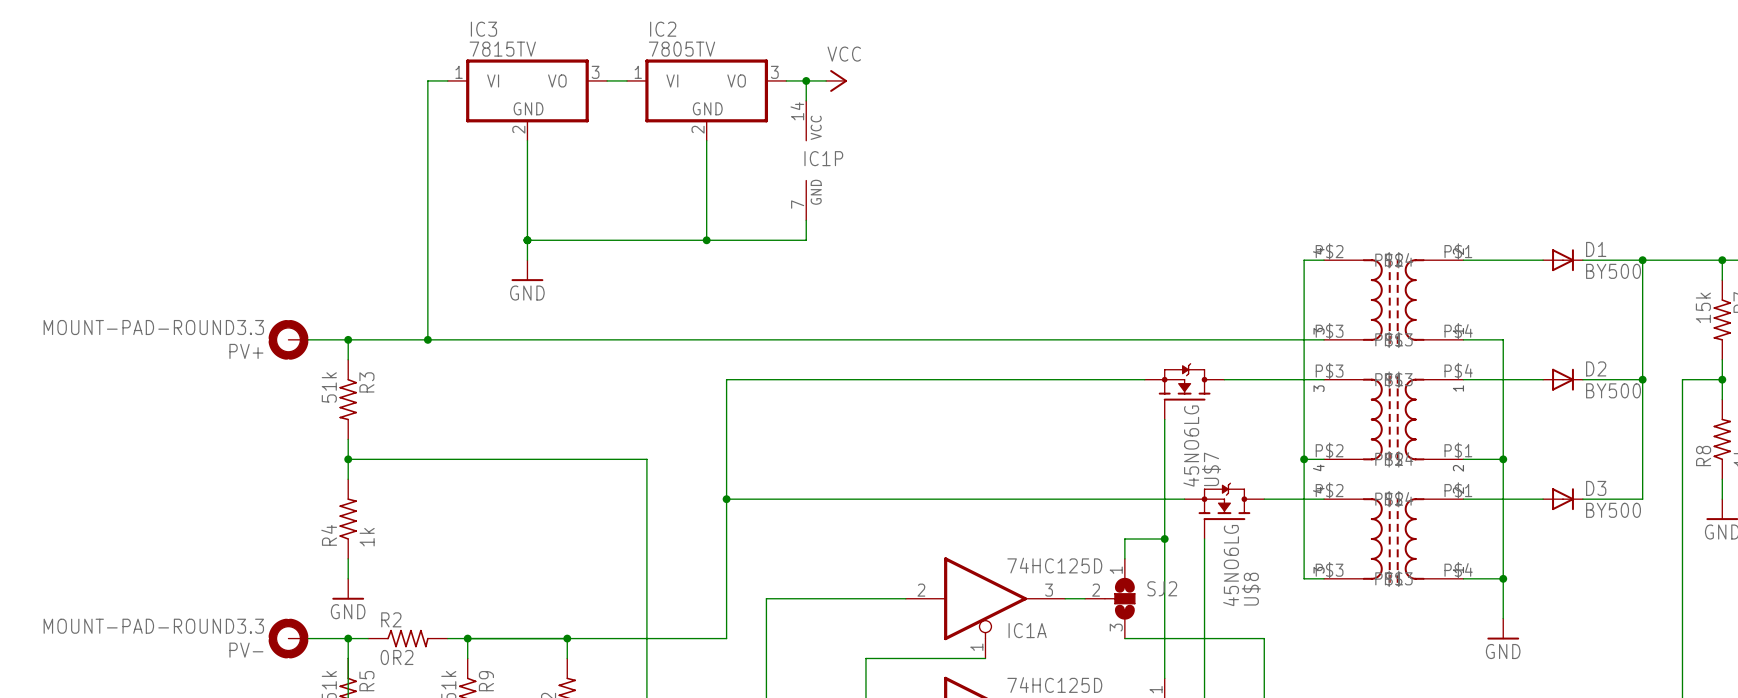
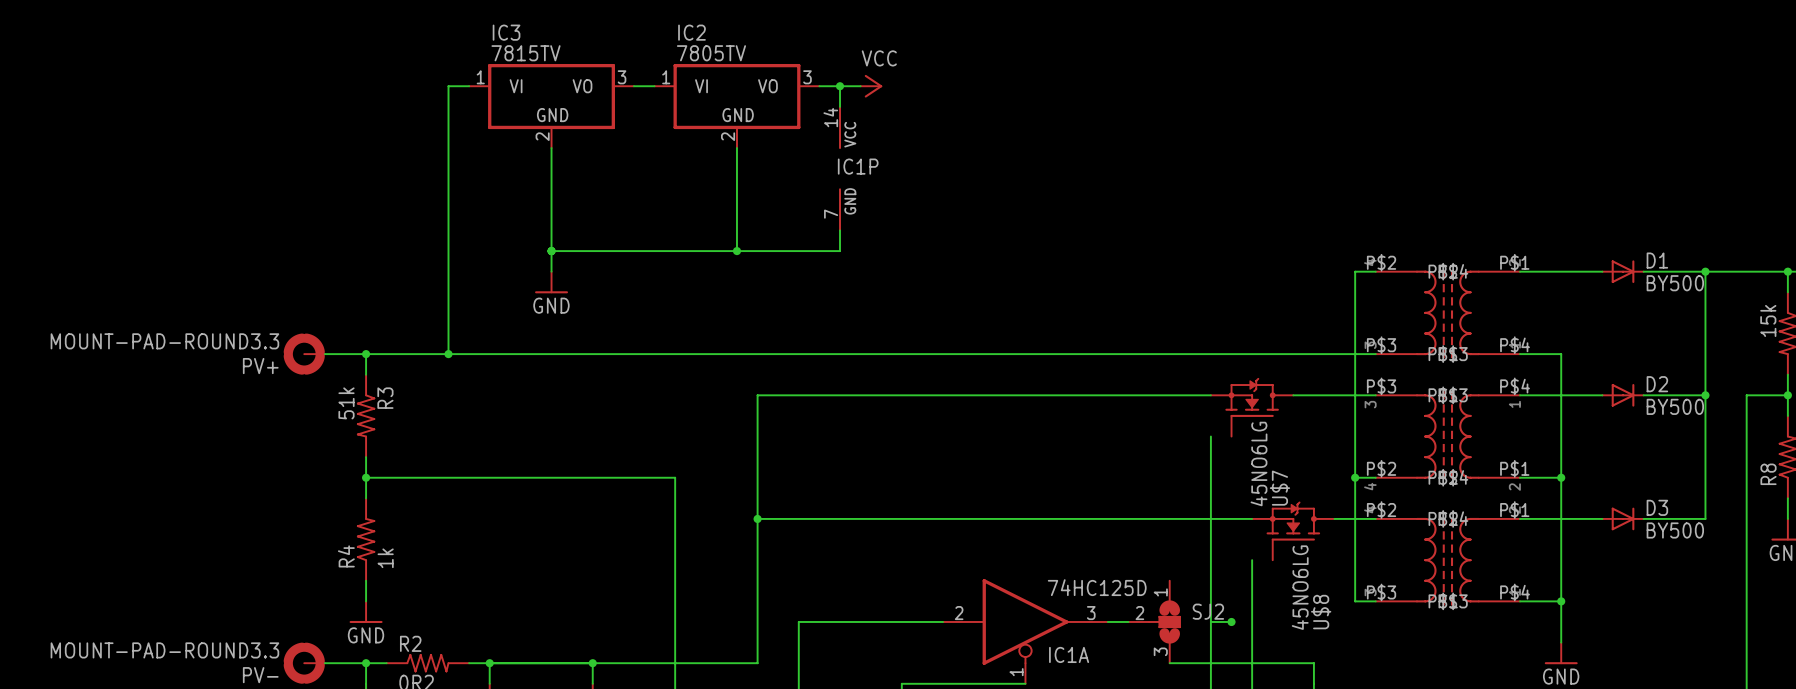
U$7 position: (1184, 391) -> (1252, 407)
U$8 position: (1224, 510) -> (1293, 531)
wire: (1164, 539) (1124, 539) (1124, 558) -> none
junction: (1164, 539) -> none
wire: none -> (1210, 621) (1231, 621)
junction: none -> (1231, 621)

